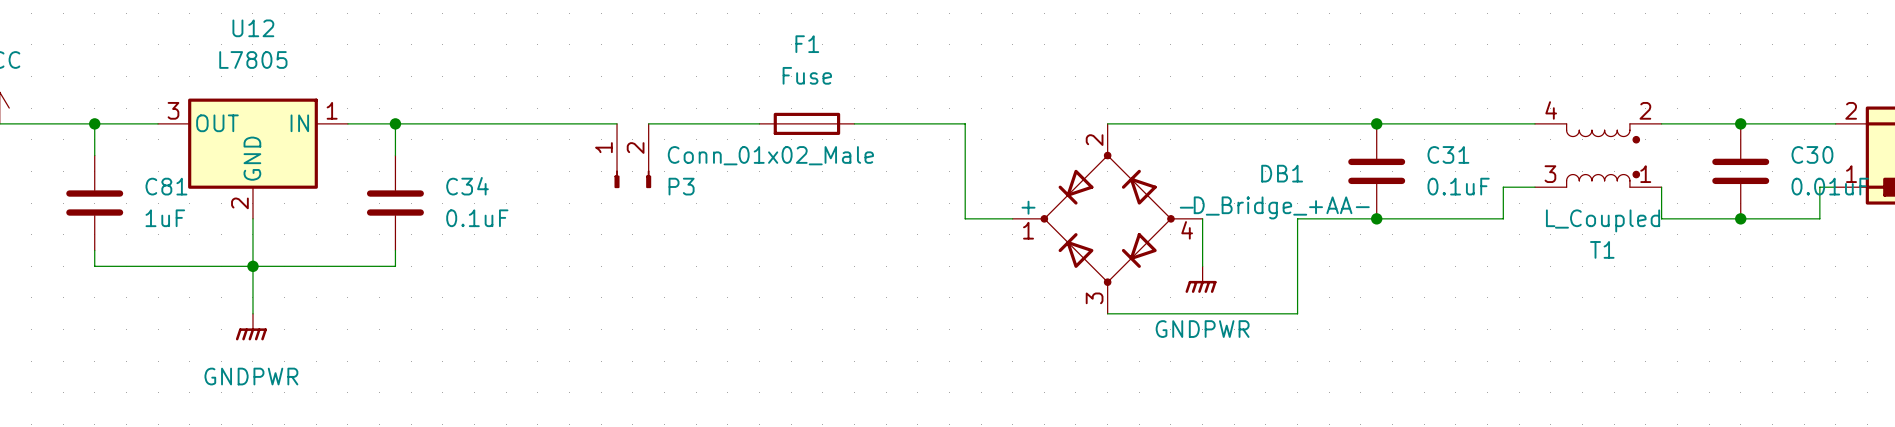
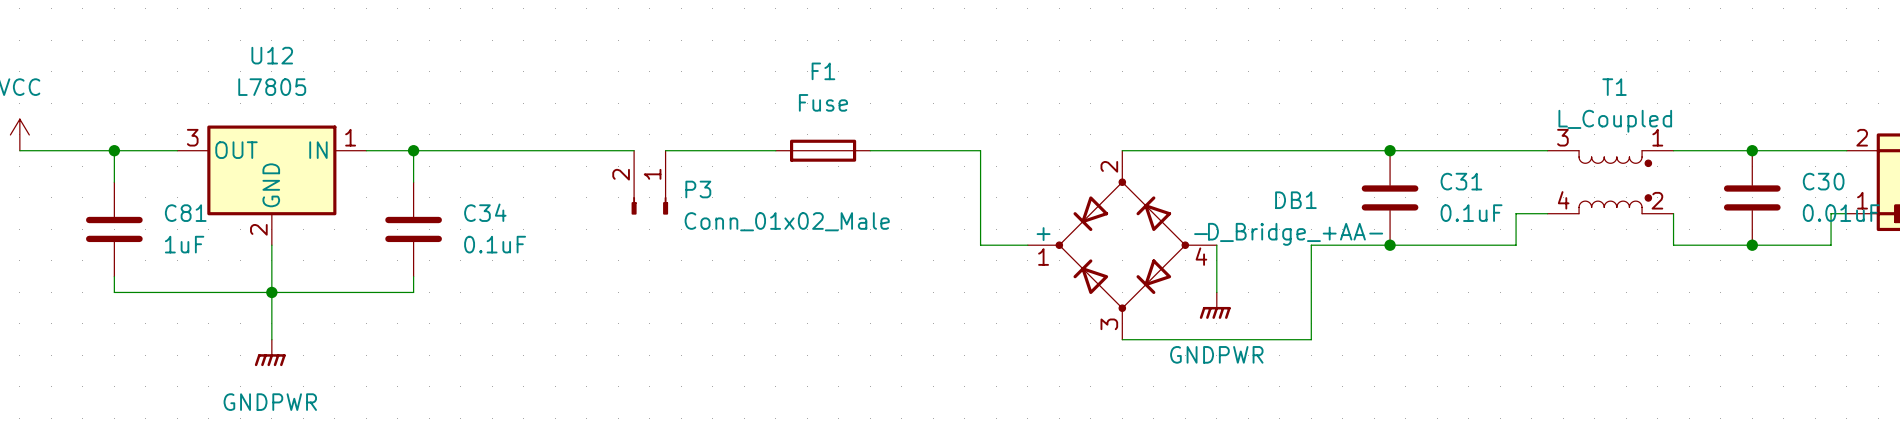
P3 value position: Conn_01x02_Male (770, 155) -> Conn_01x02_Male (787, 221)
T1 flip: as is (1603, 155) -> up-down (1615, 182)
P3 flip: as is (632, 179) -> left-right (649, 205)

